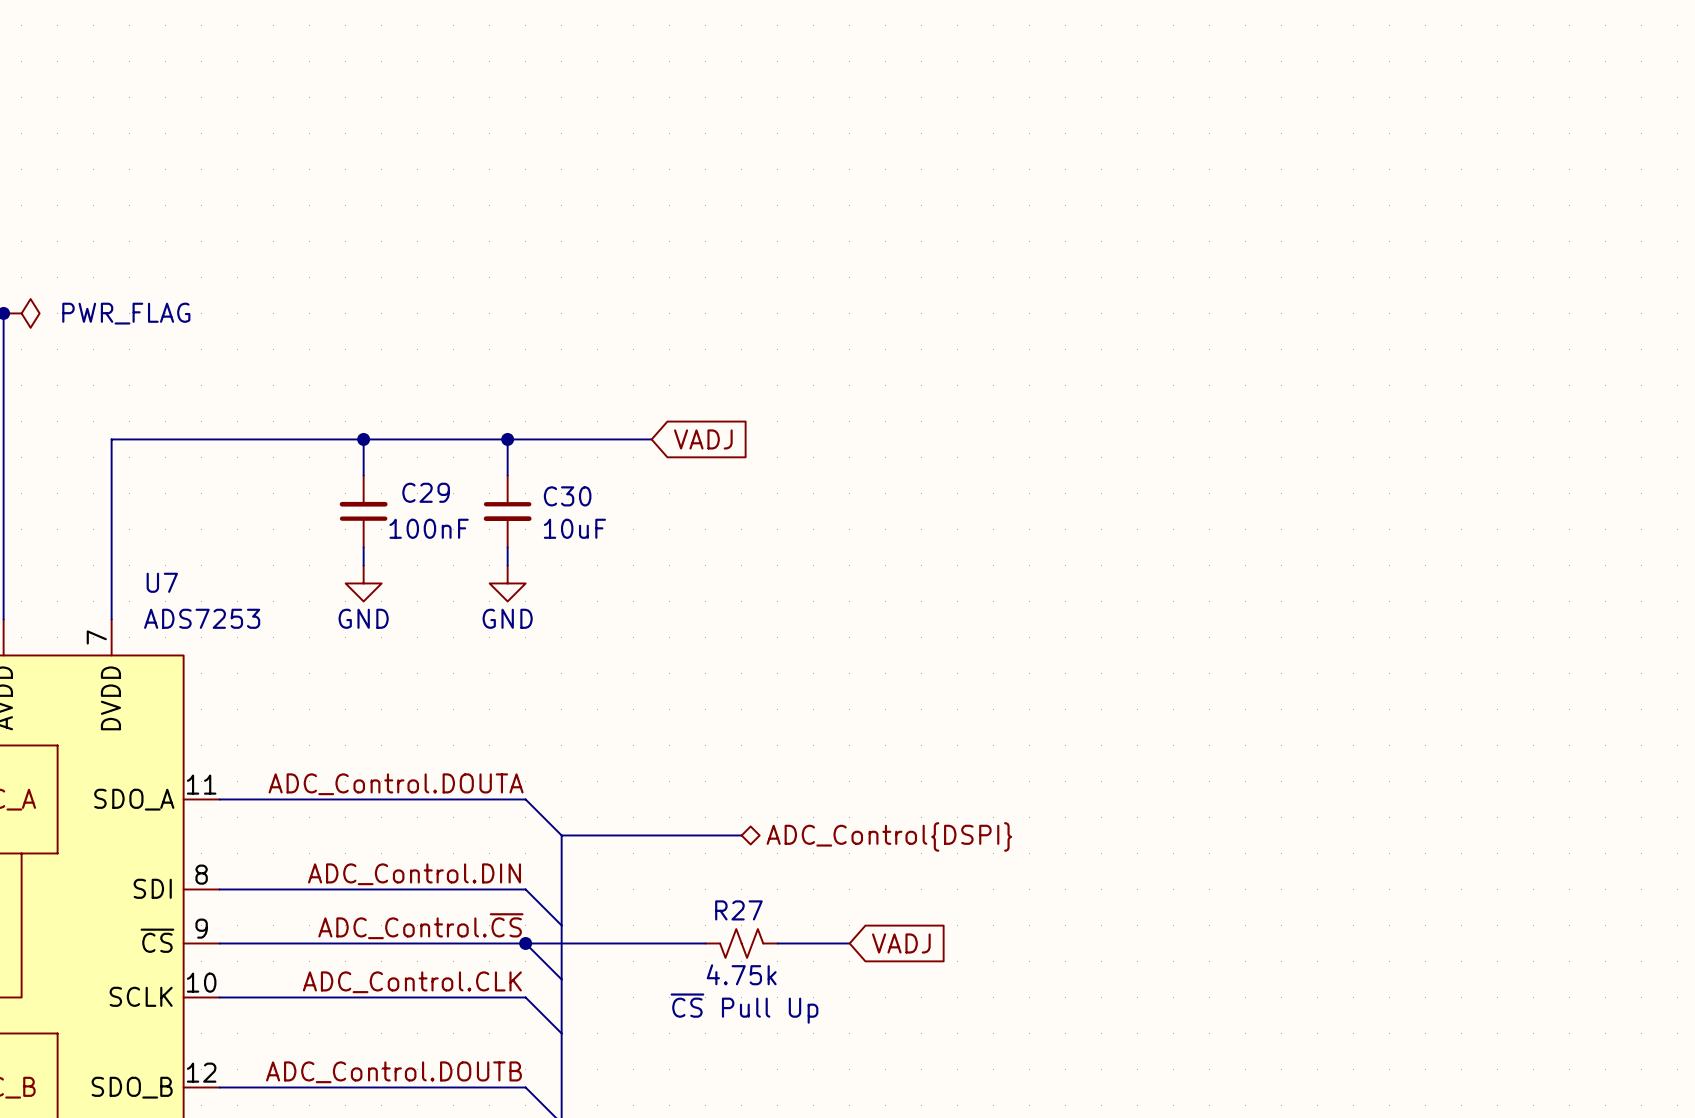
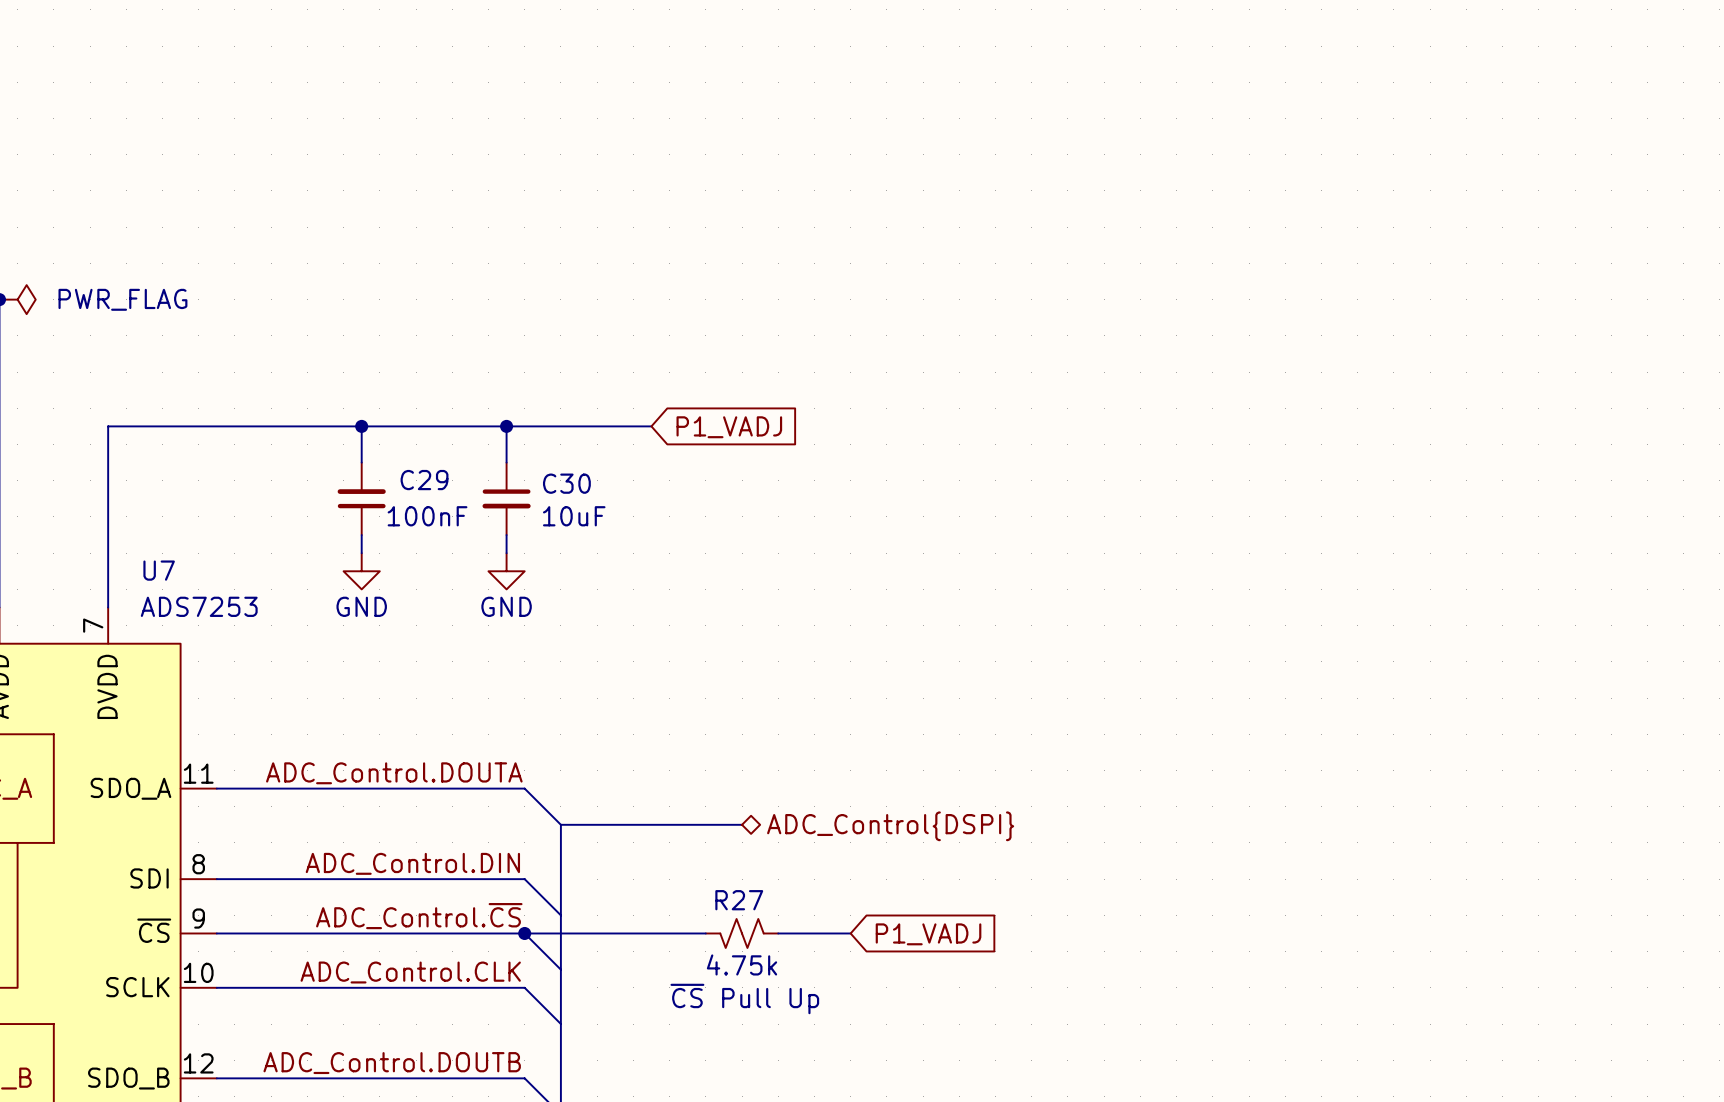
global label: VADJ (703, 439) -> P1_VADJ (729, 427)
global label: VADJ (901, 943) -> P1_VADJ (928, 934)

